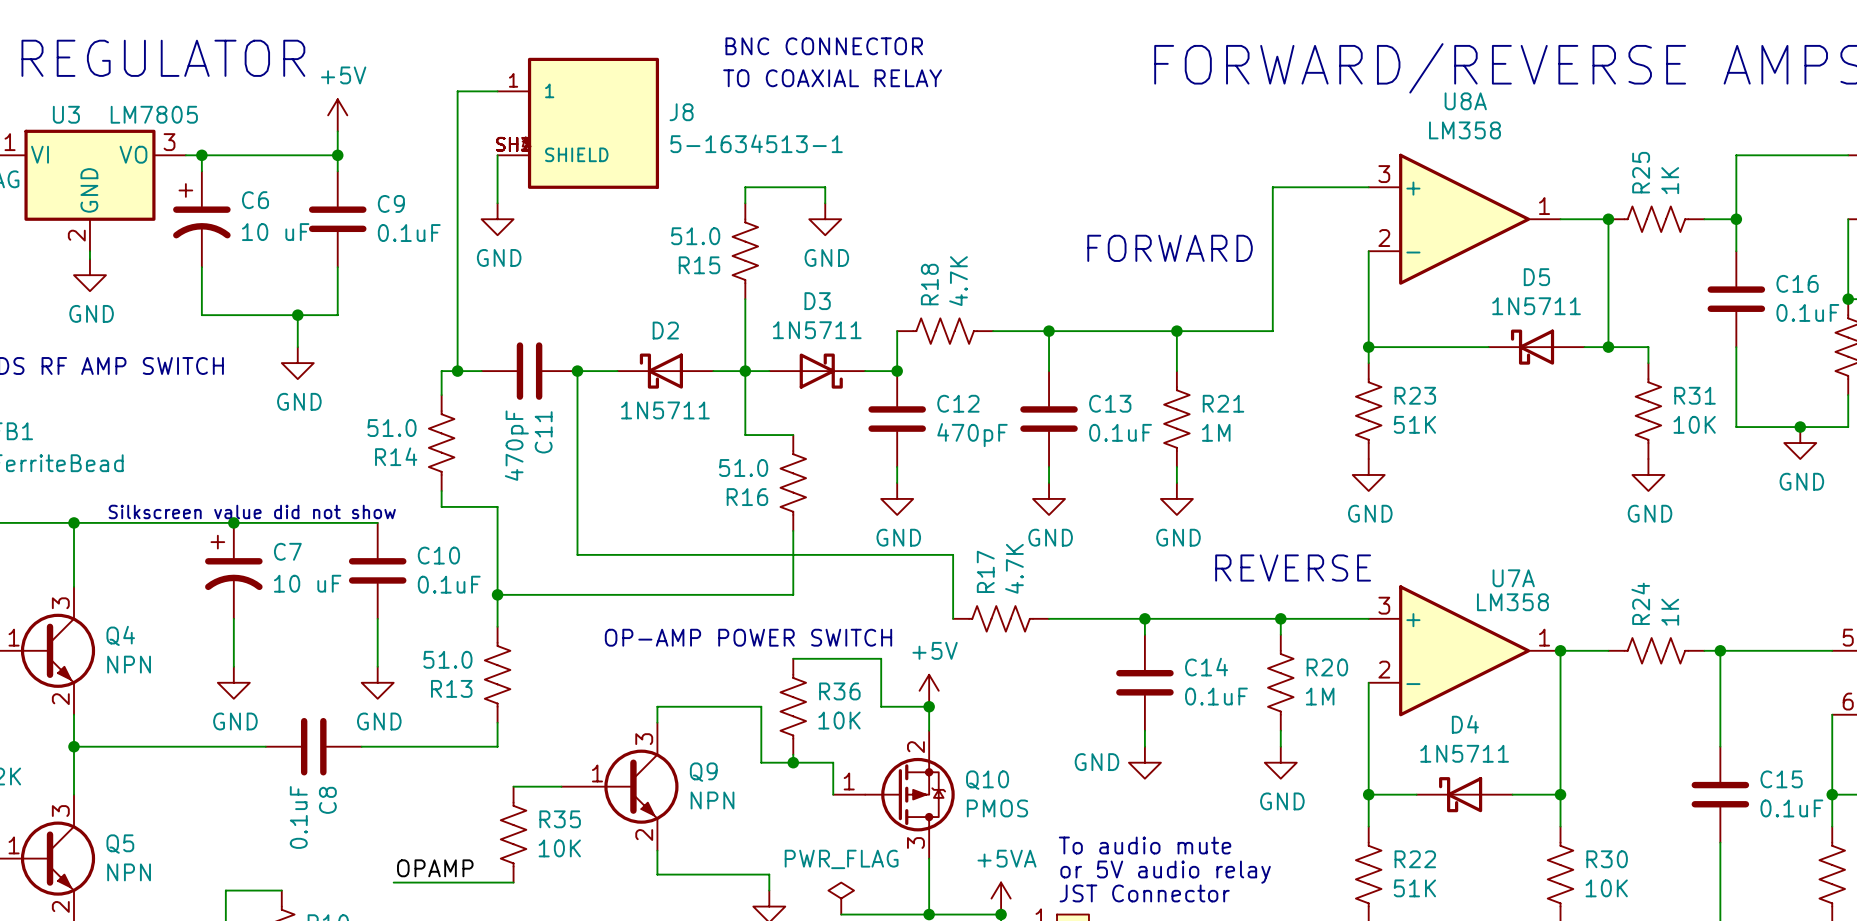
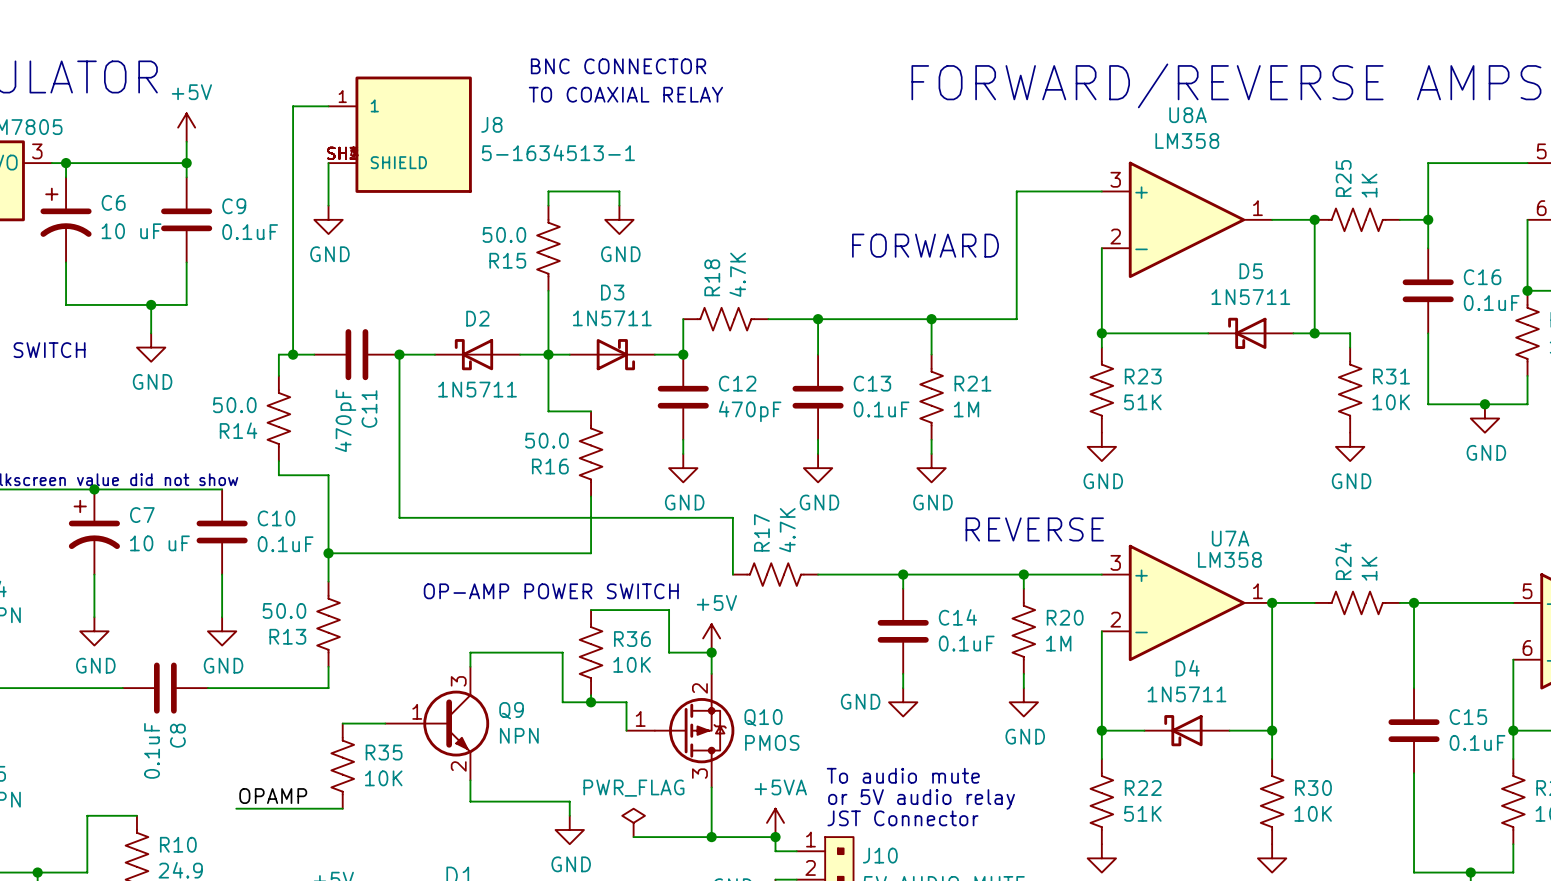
R15 value: 51.0 (695, 236) -> 50.0 (504, 234)
R14 value: 51.0 (391, 428) -> 50.0 (234, 405)
R16 value: 51.0 (743, 467) -> 50.0 (546, 440)
R13 value: 51.0 (447, 659) -> 50.0 (284, 610)

